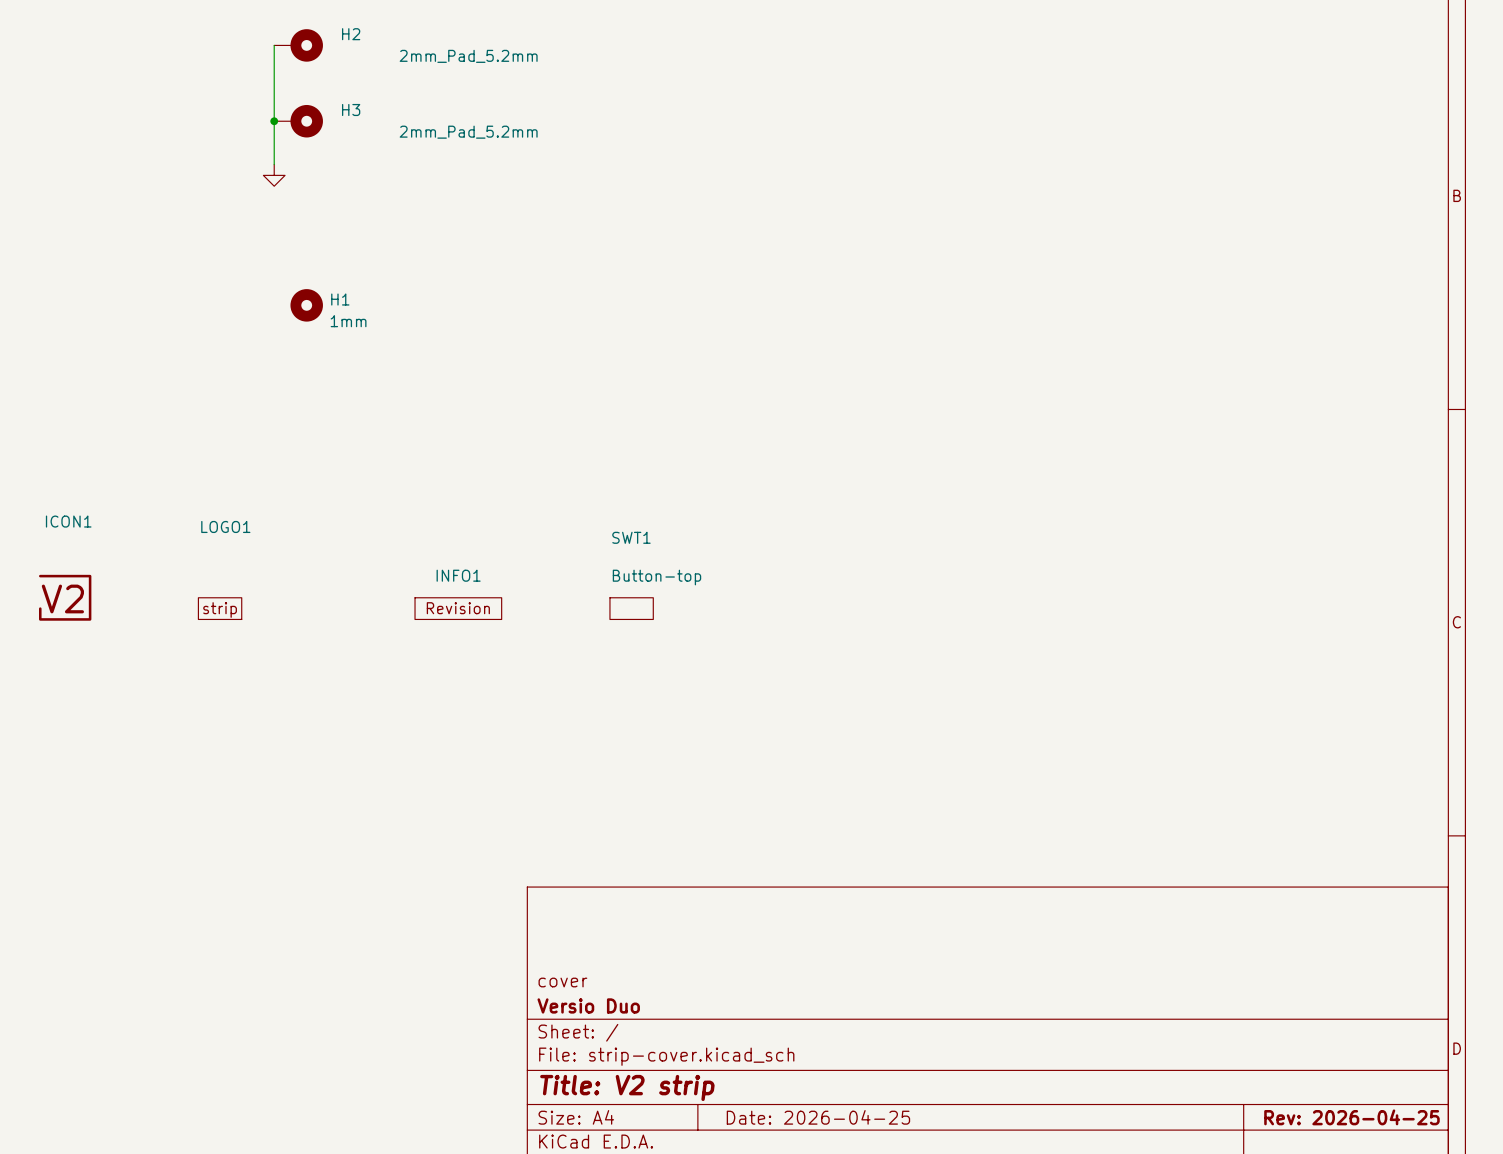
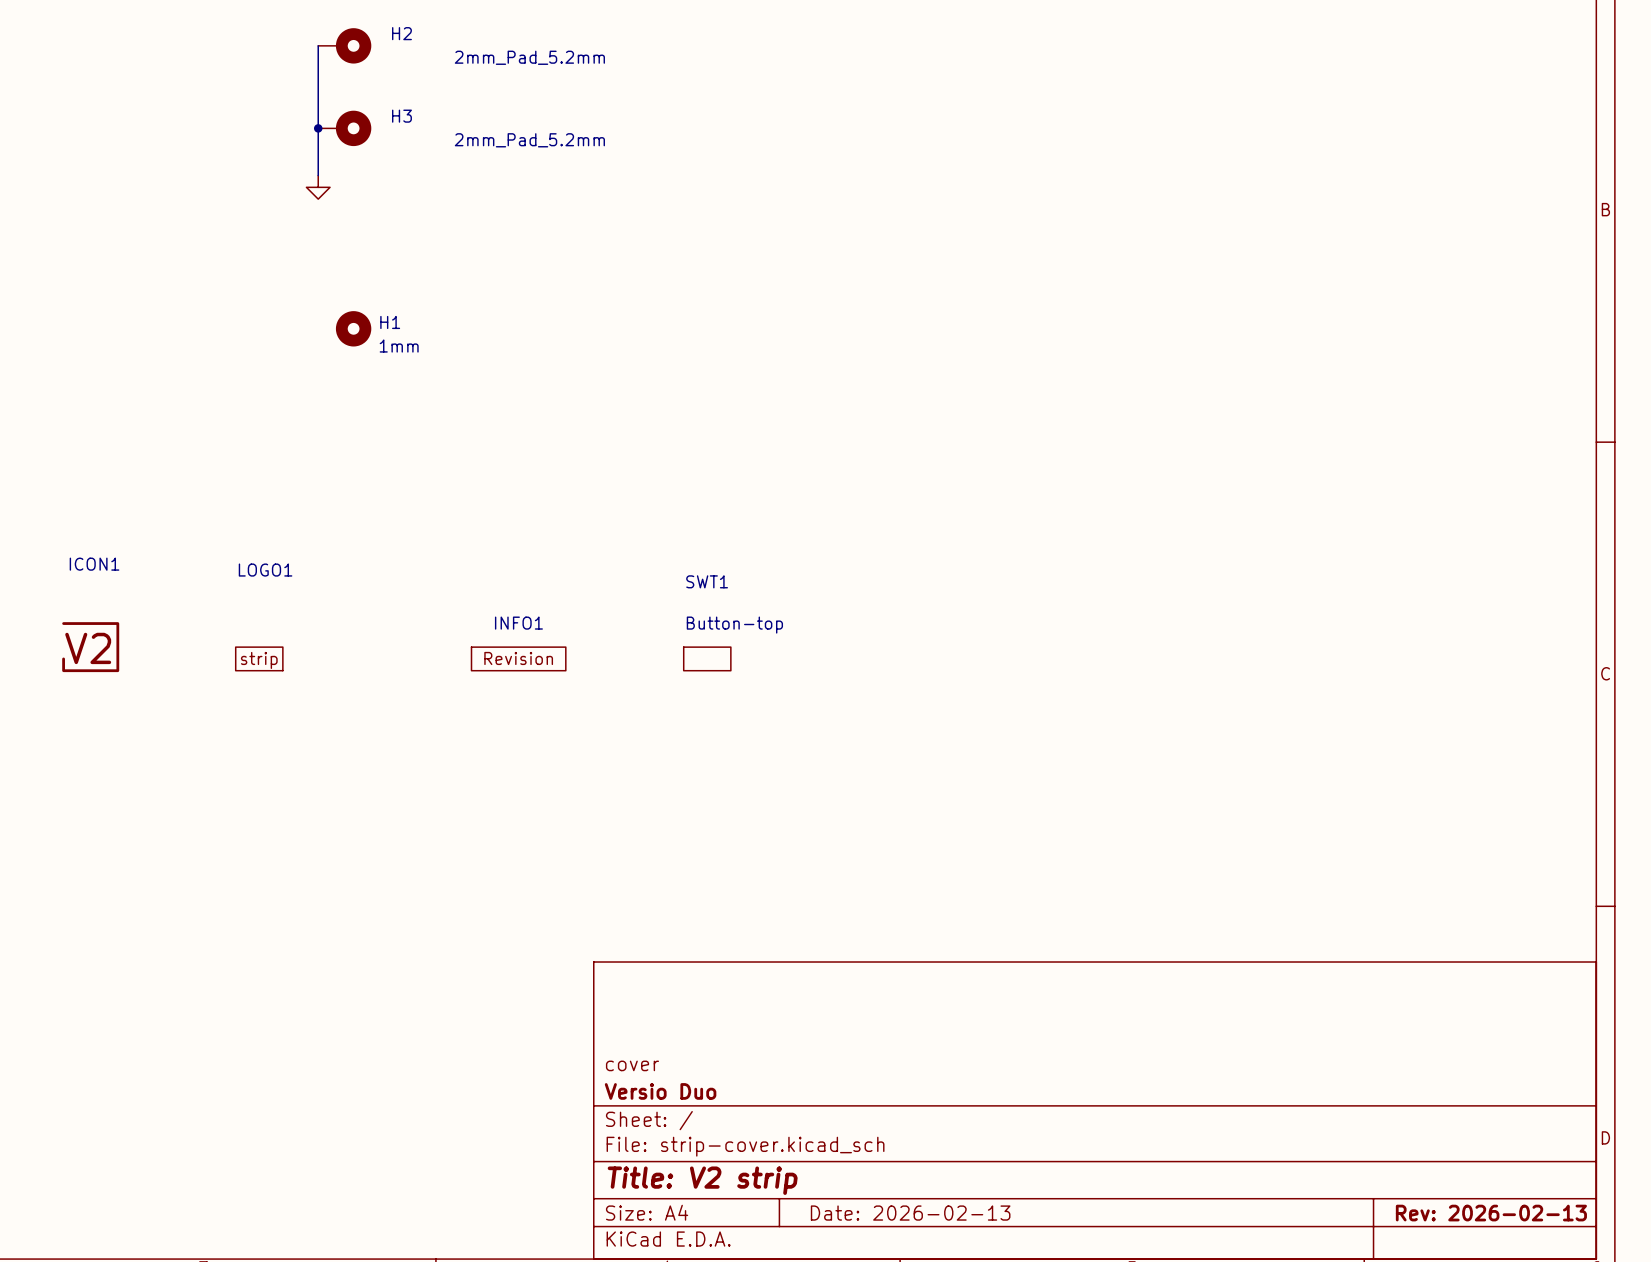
title block: Date: 2026-04-25 (818, 1117) -> Date: 2026-02-13 (910, 1213)
title block: Rev: 2026-04-25 (1351, 1117) -> Rev: 2026-02-13 (1491, 1213)

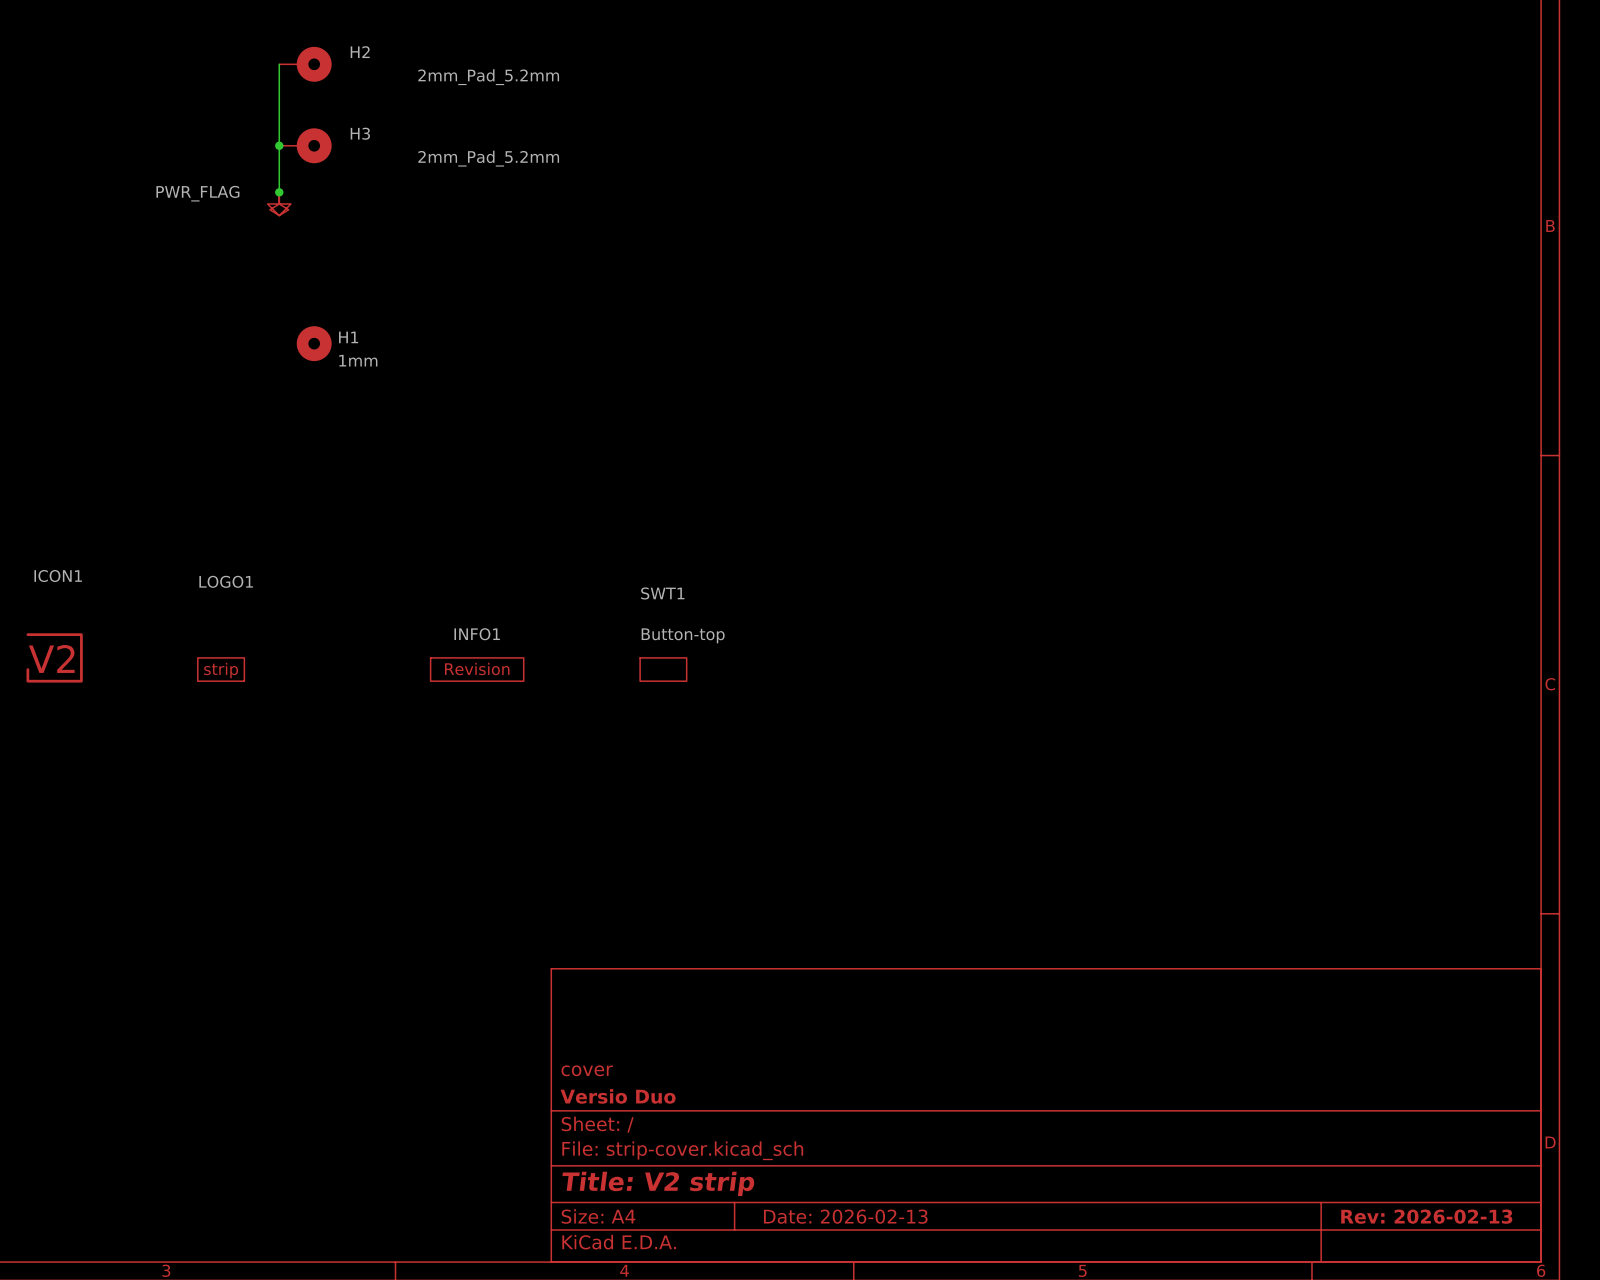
junction: none -> (279, 192)
power symbol: none -> PWR_FLAG (279, 203)

